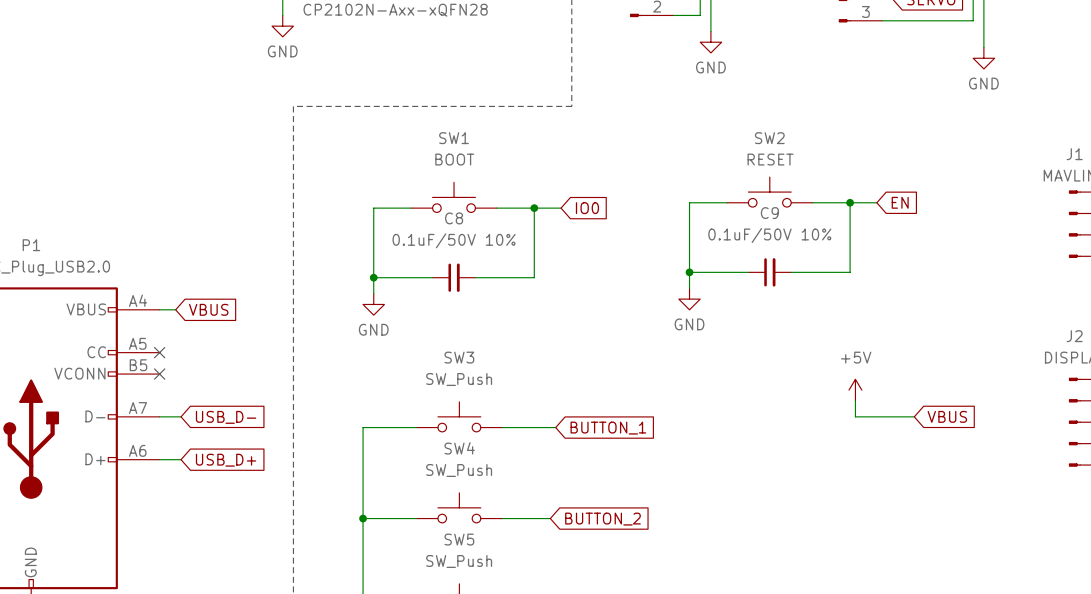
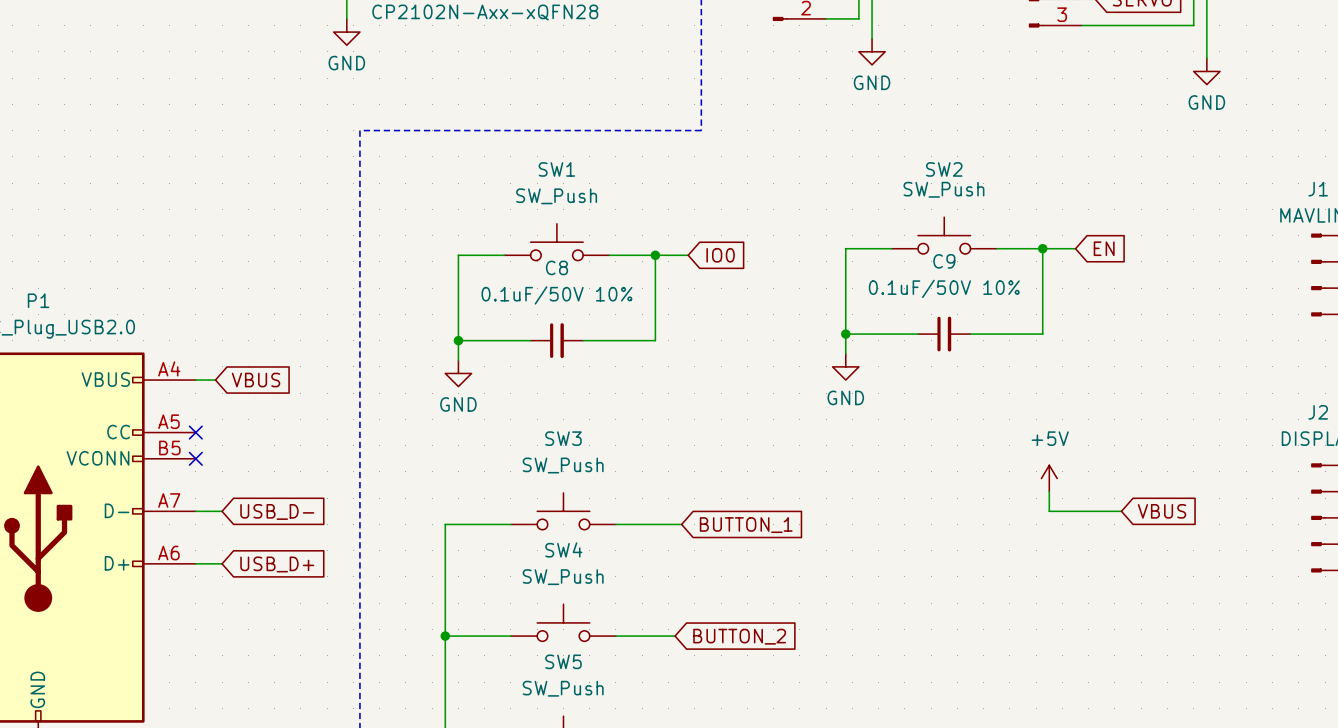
SW1 value: BOOT (454, 159) -> SW_Push (556, 196)
SW2 value: RESET (770, 159) -> SW_Push (943, 189)

